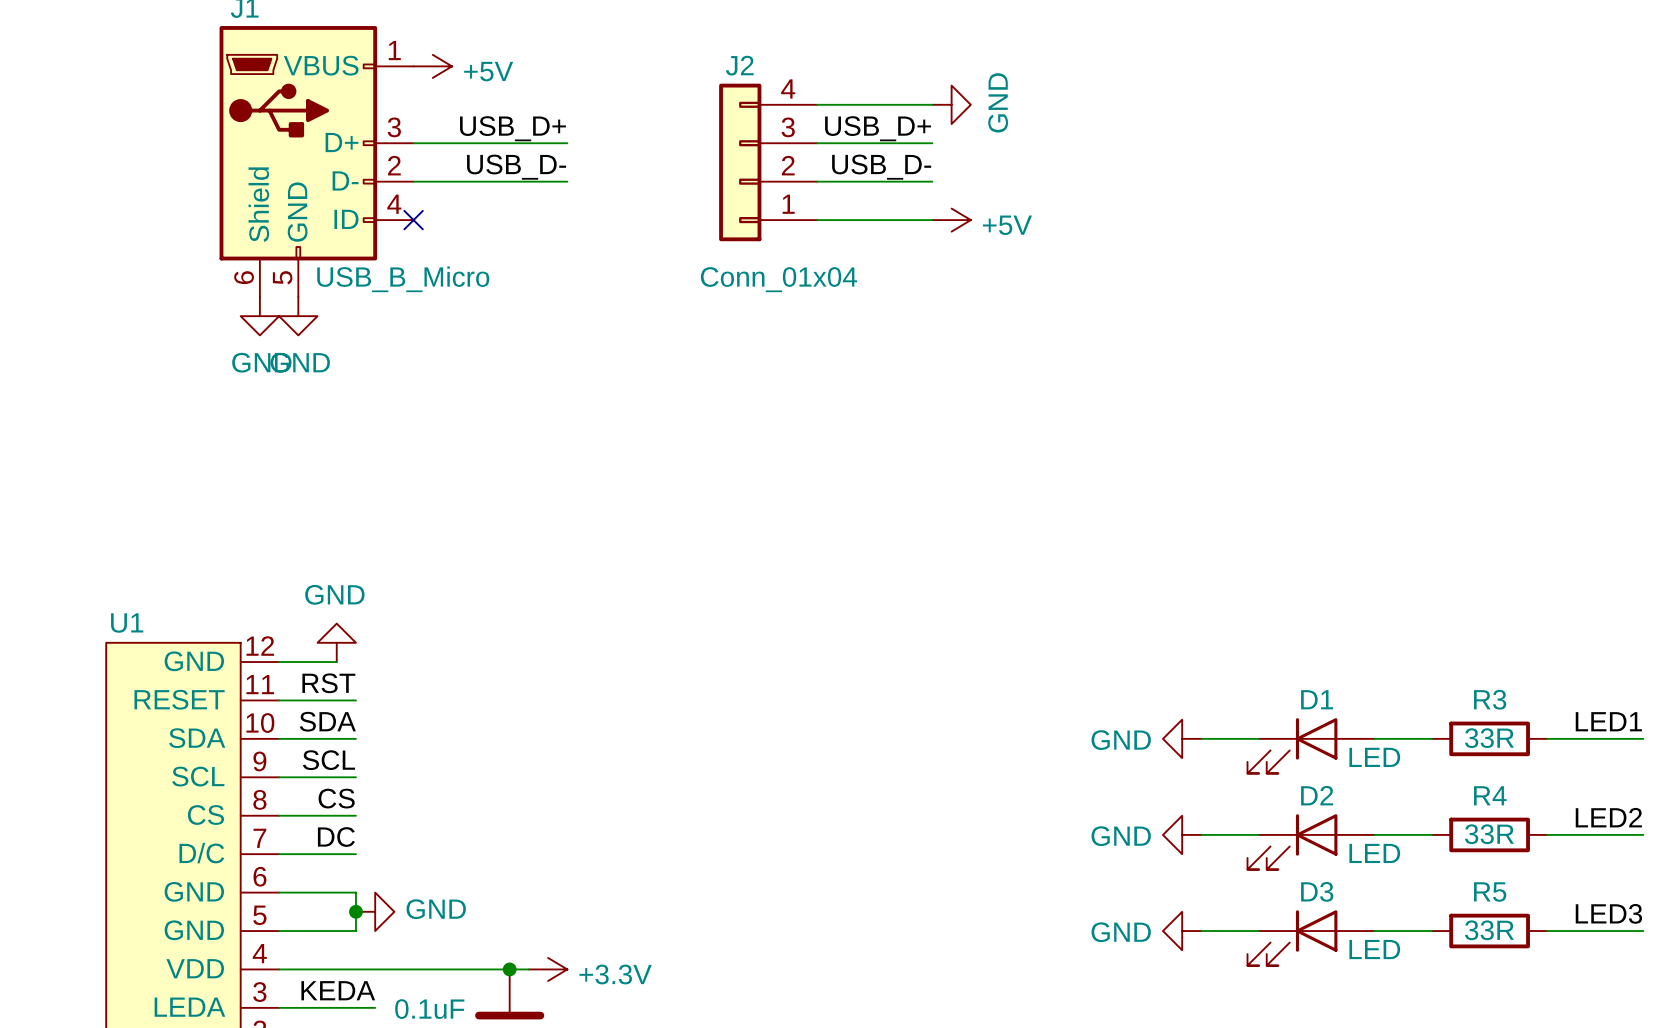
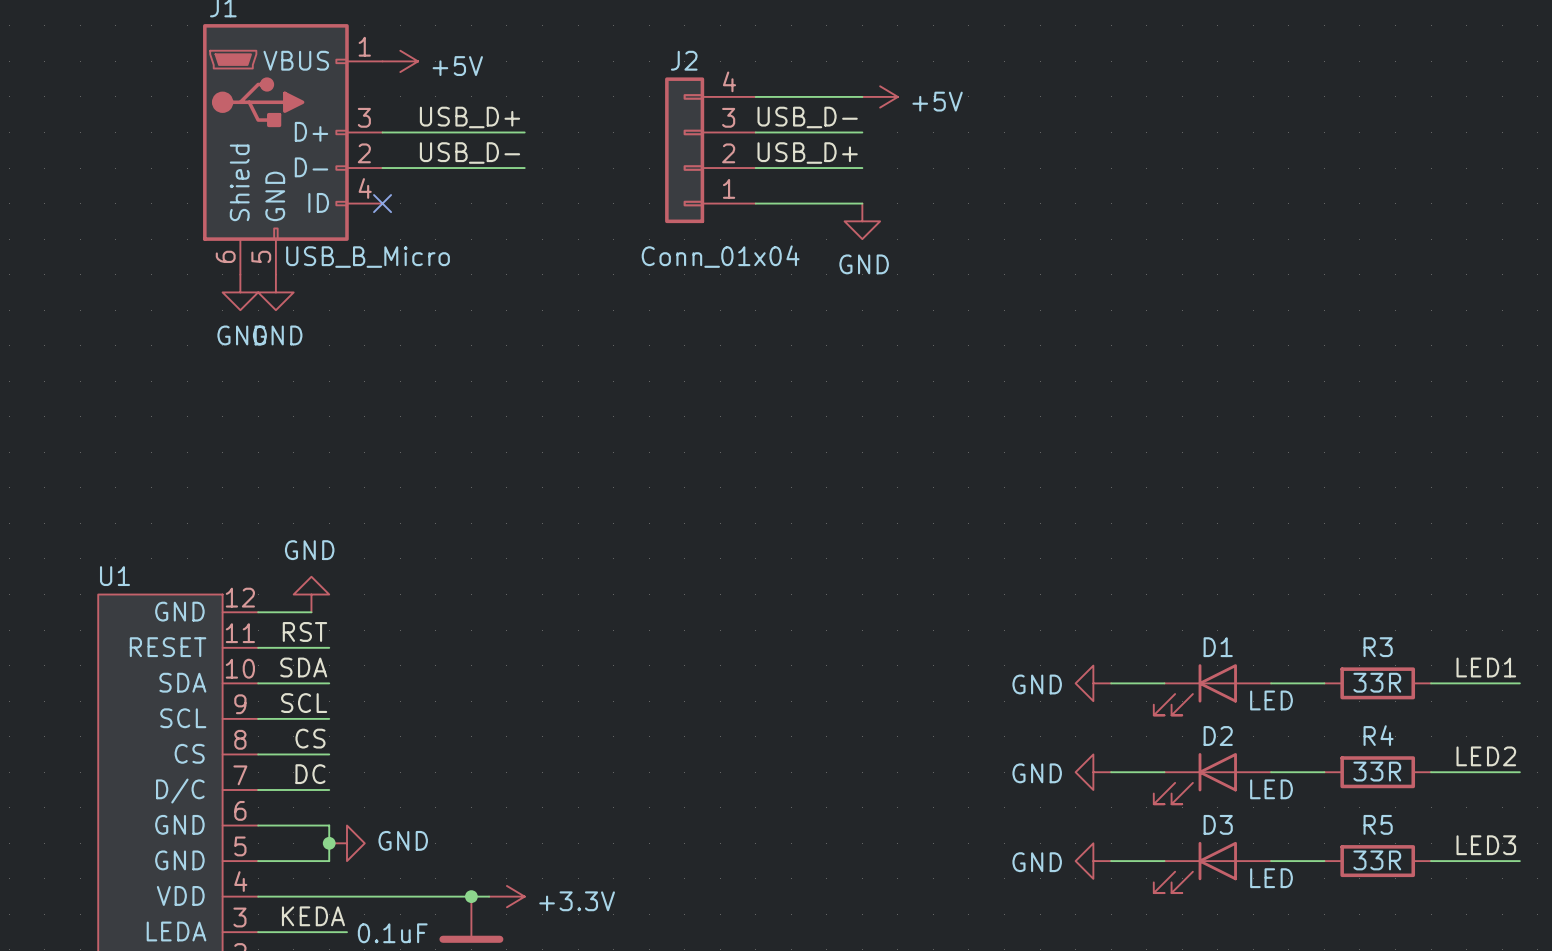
power symbol: GND (951, 104) -> +5V (880, 96)
label: USB_D+ (878, 128) -> USB_D- (807, 117)
label: USB_D- (881, 167) -> USB_D+ (807, 153)
power symbol: +5V (951, 220) -> none
power symbol: none -> GND (862, 221)

